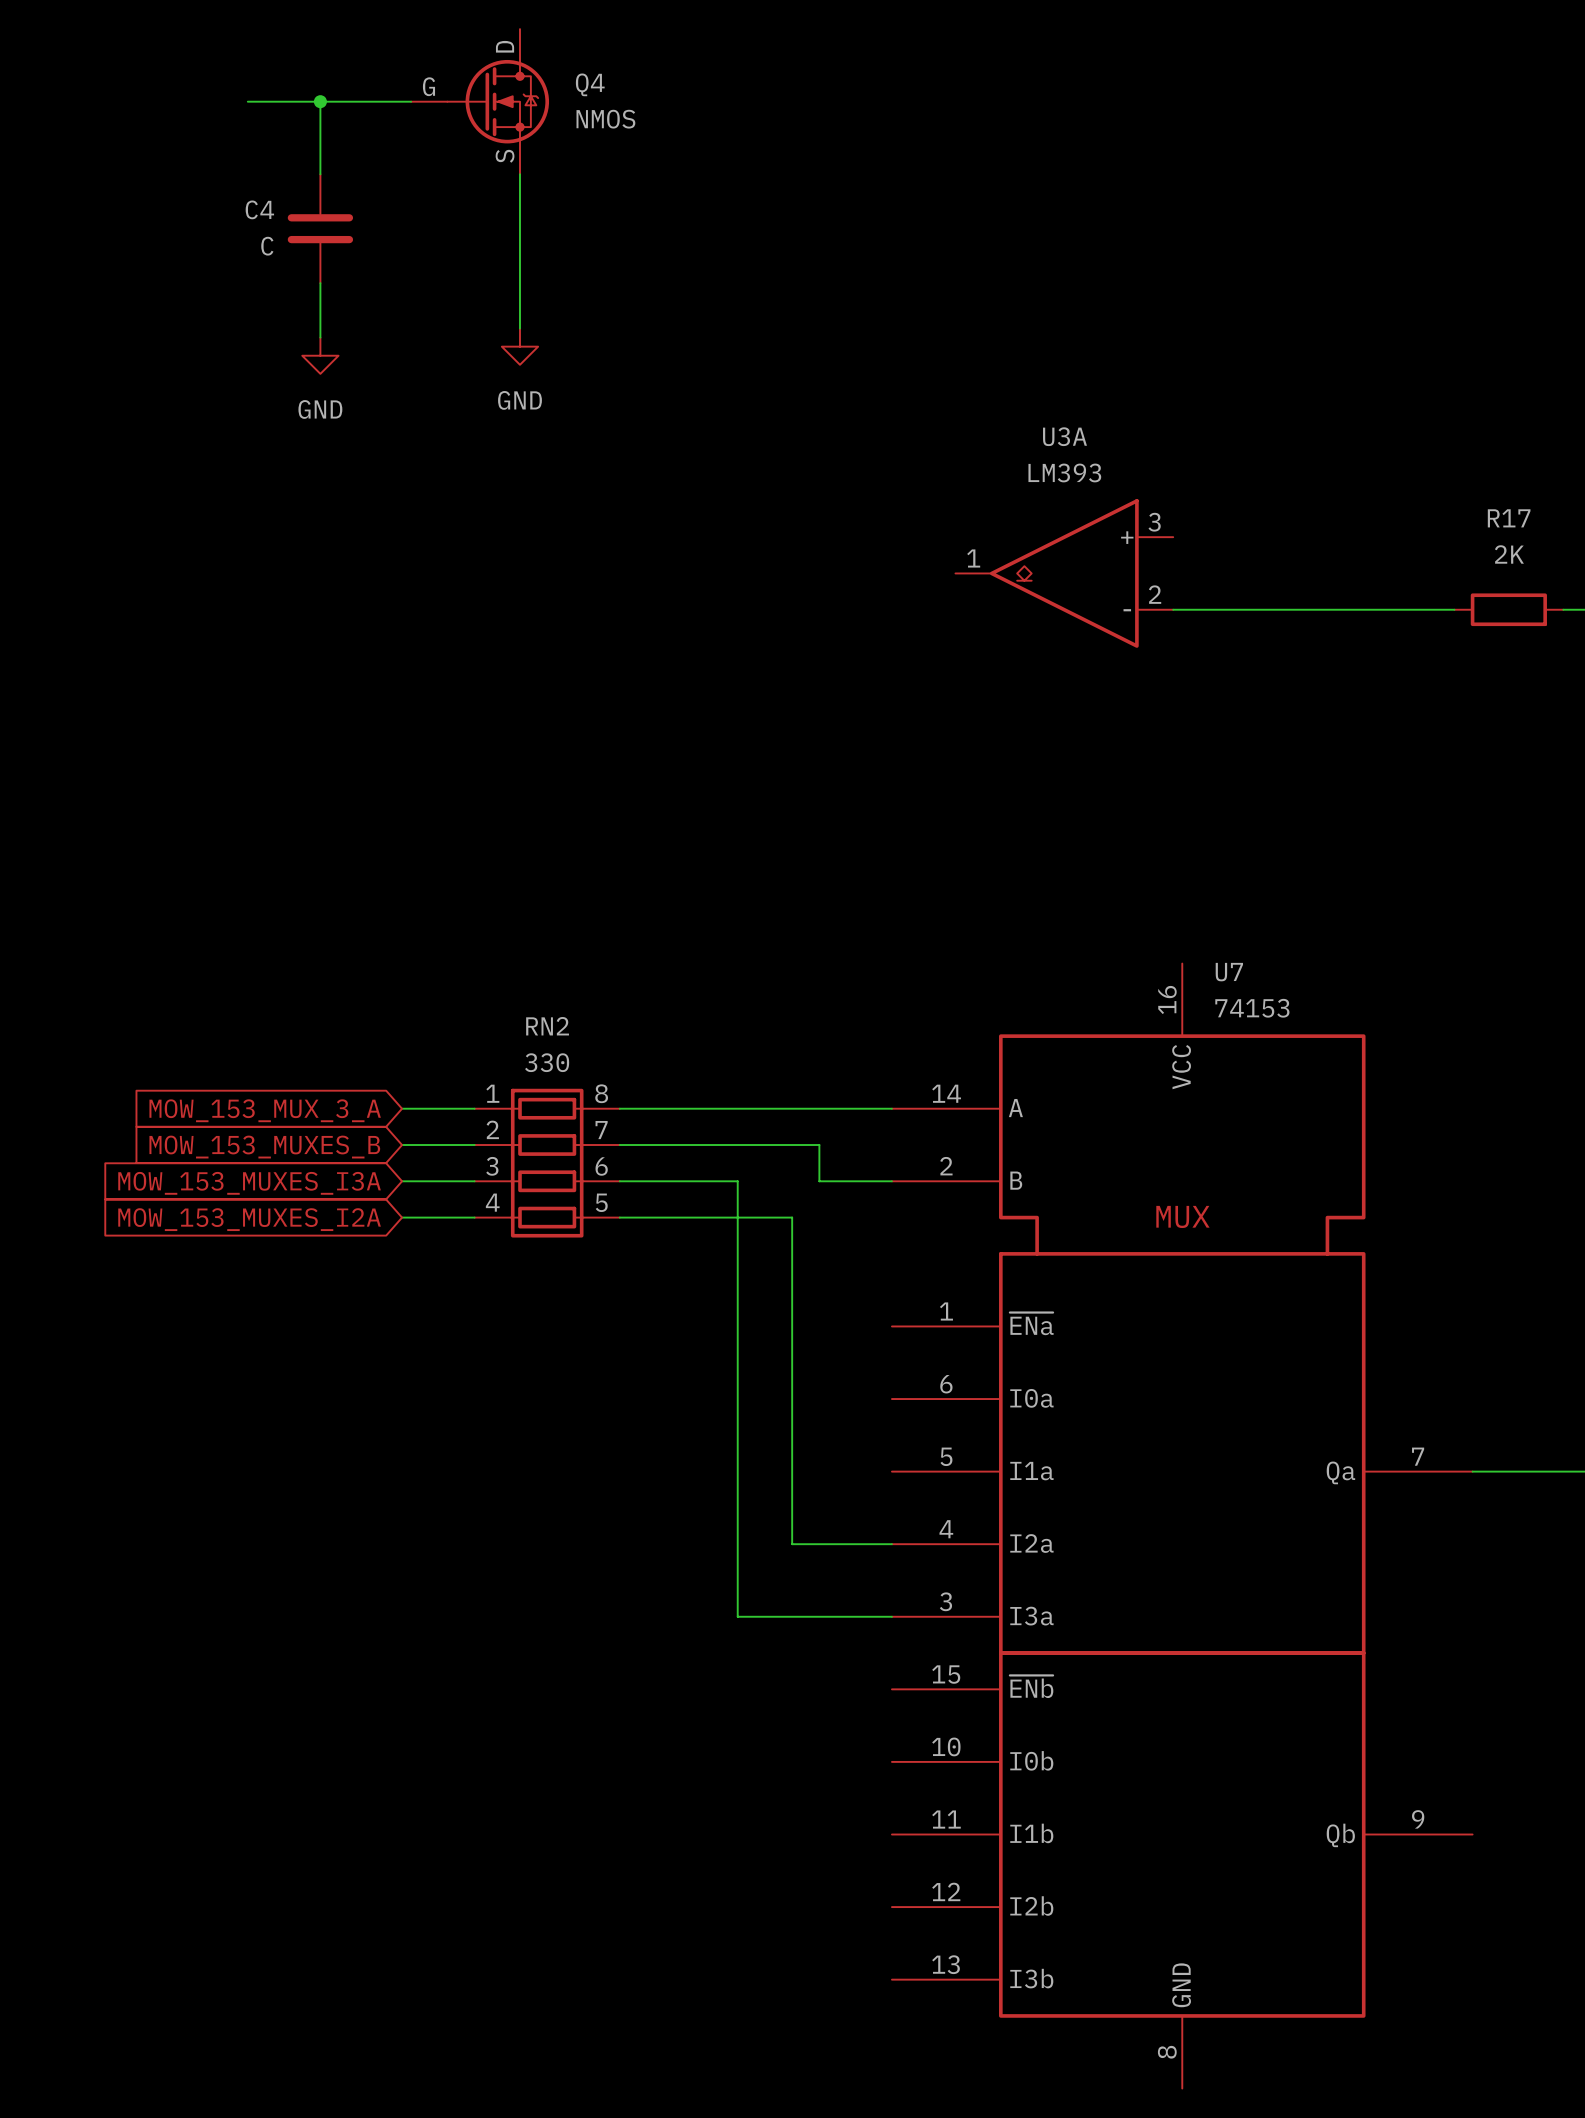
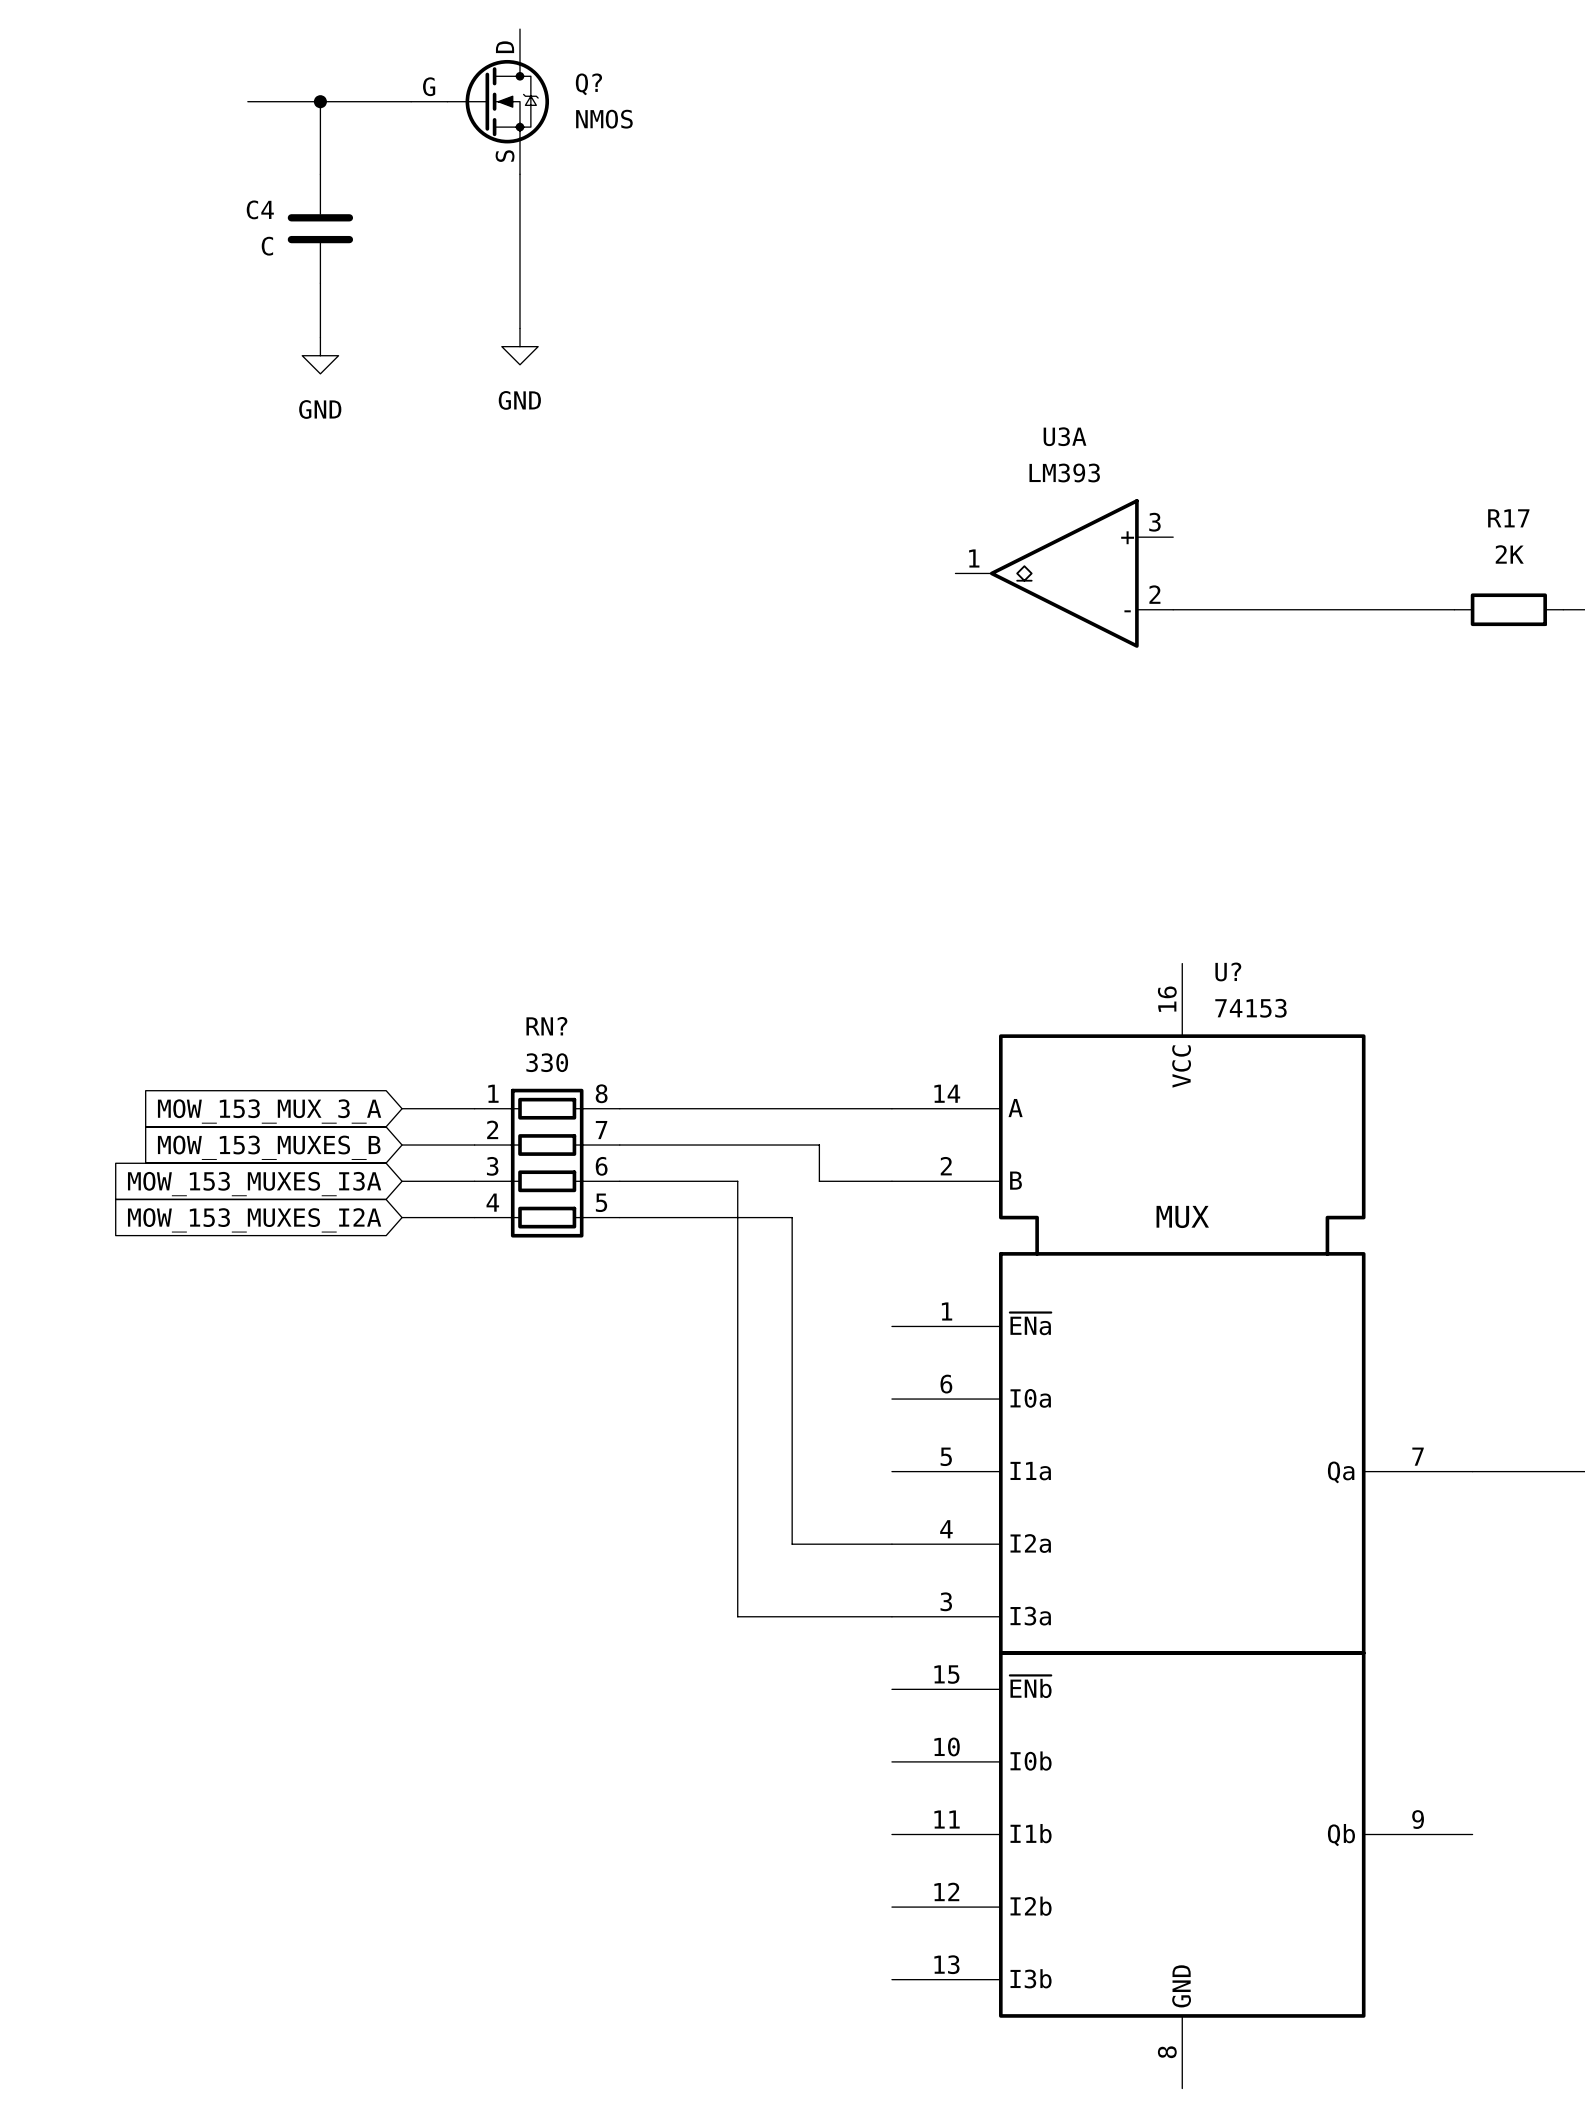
Q4 name: Q4 (590, 84) -> Q? (588, 84)
U7 name: U7 (1229, 972) -> U? (1228, 971)
RN2 name: RN2 (547, 1026) -> RN? (546, 1026)

